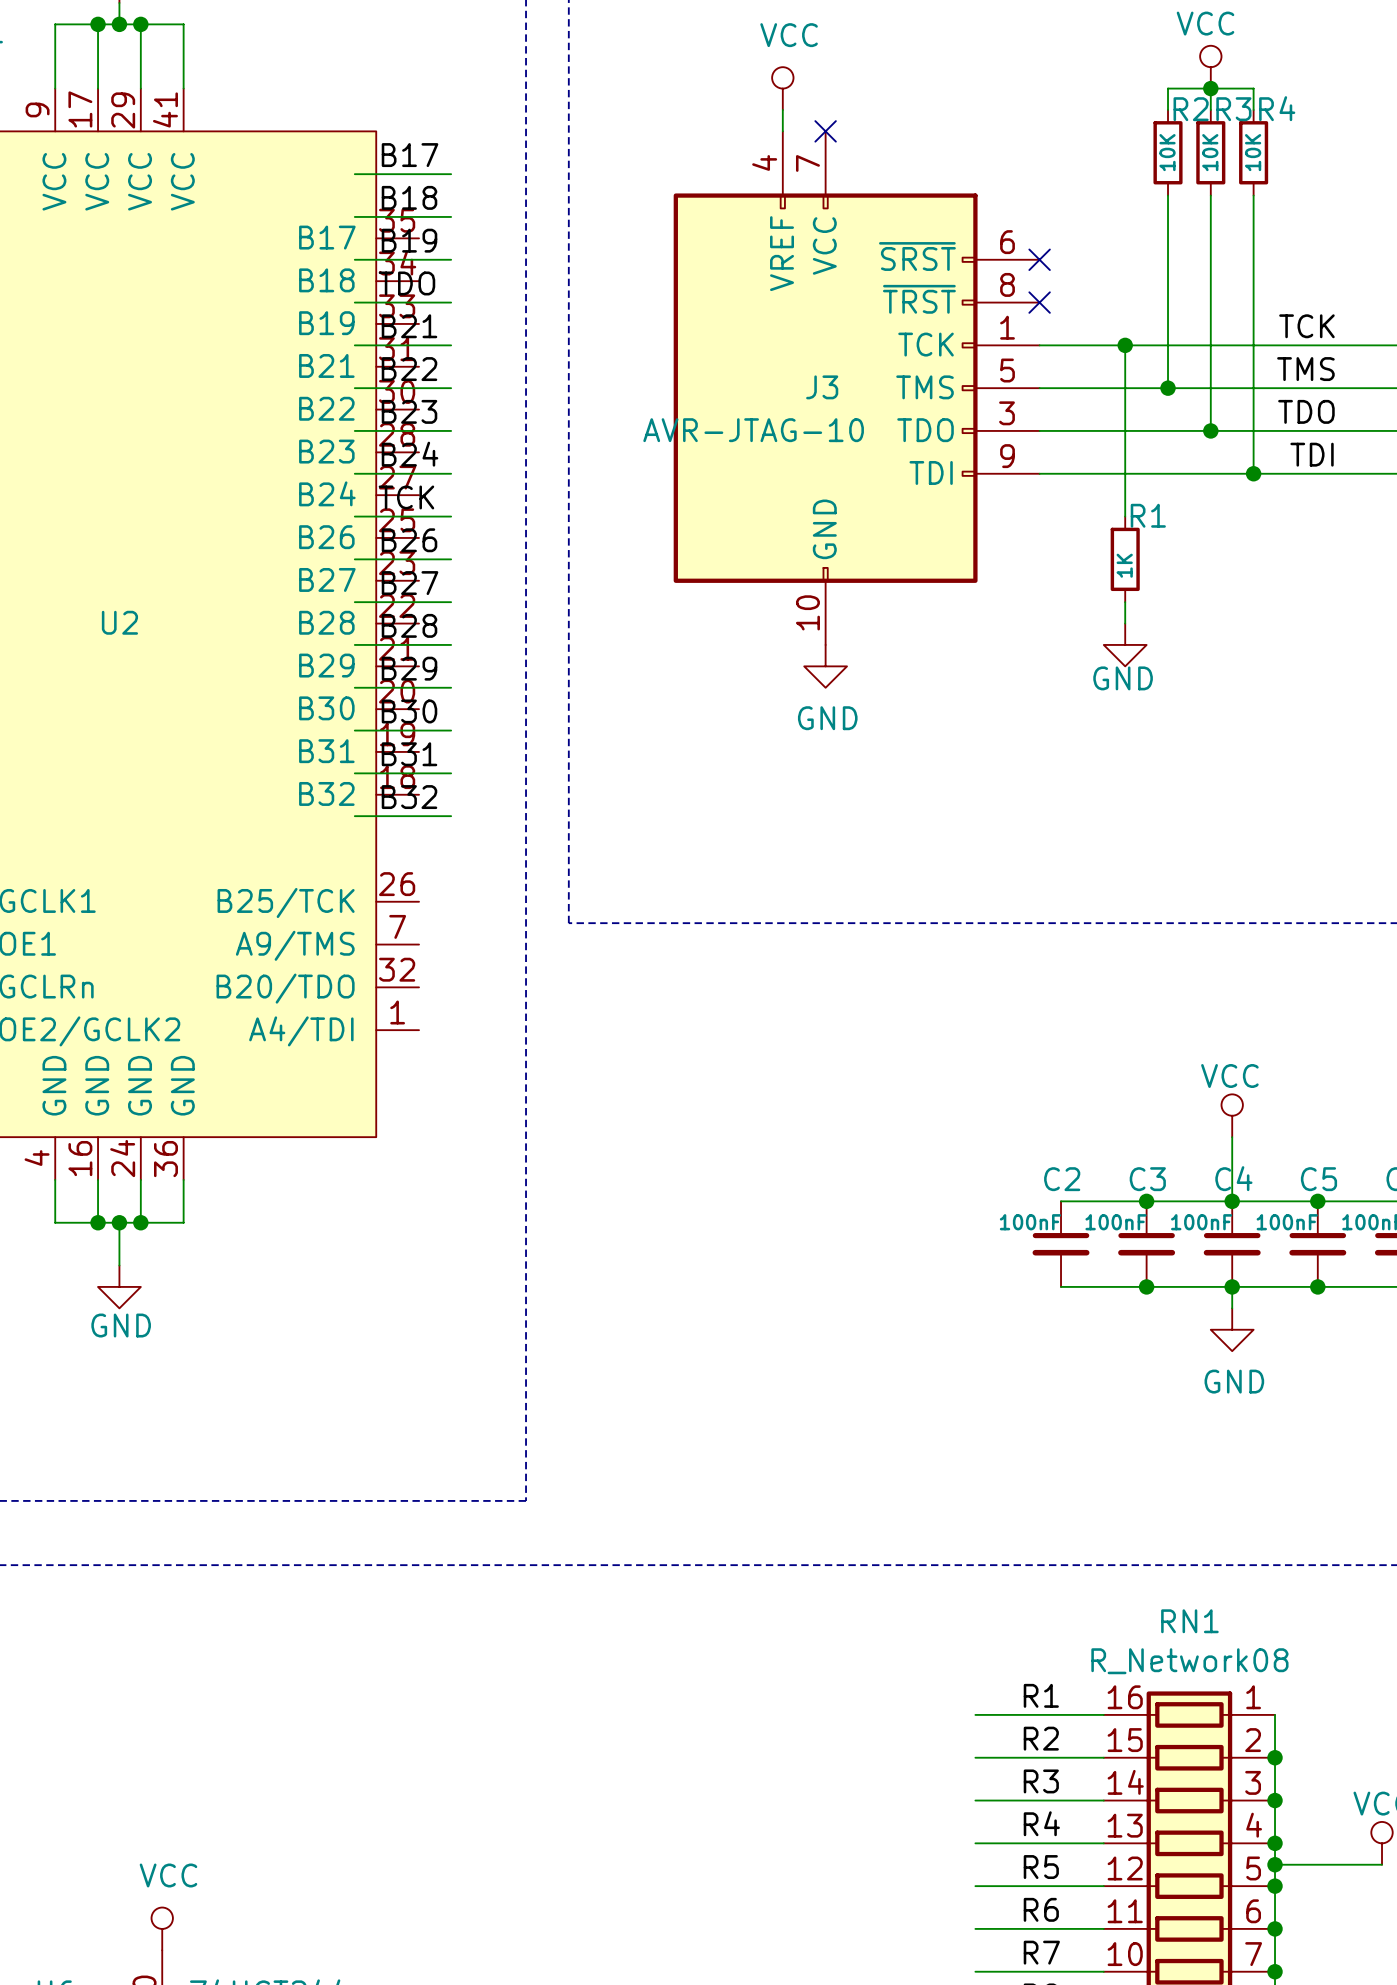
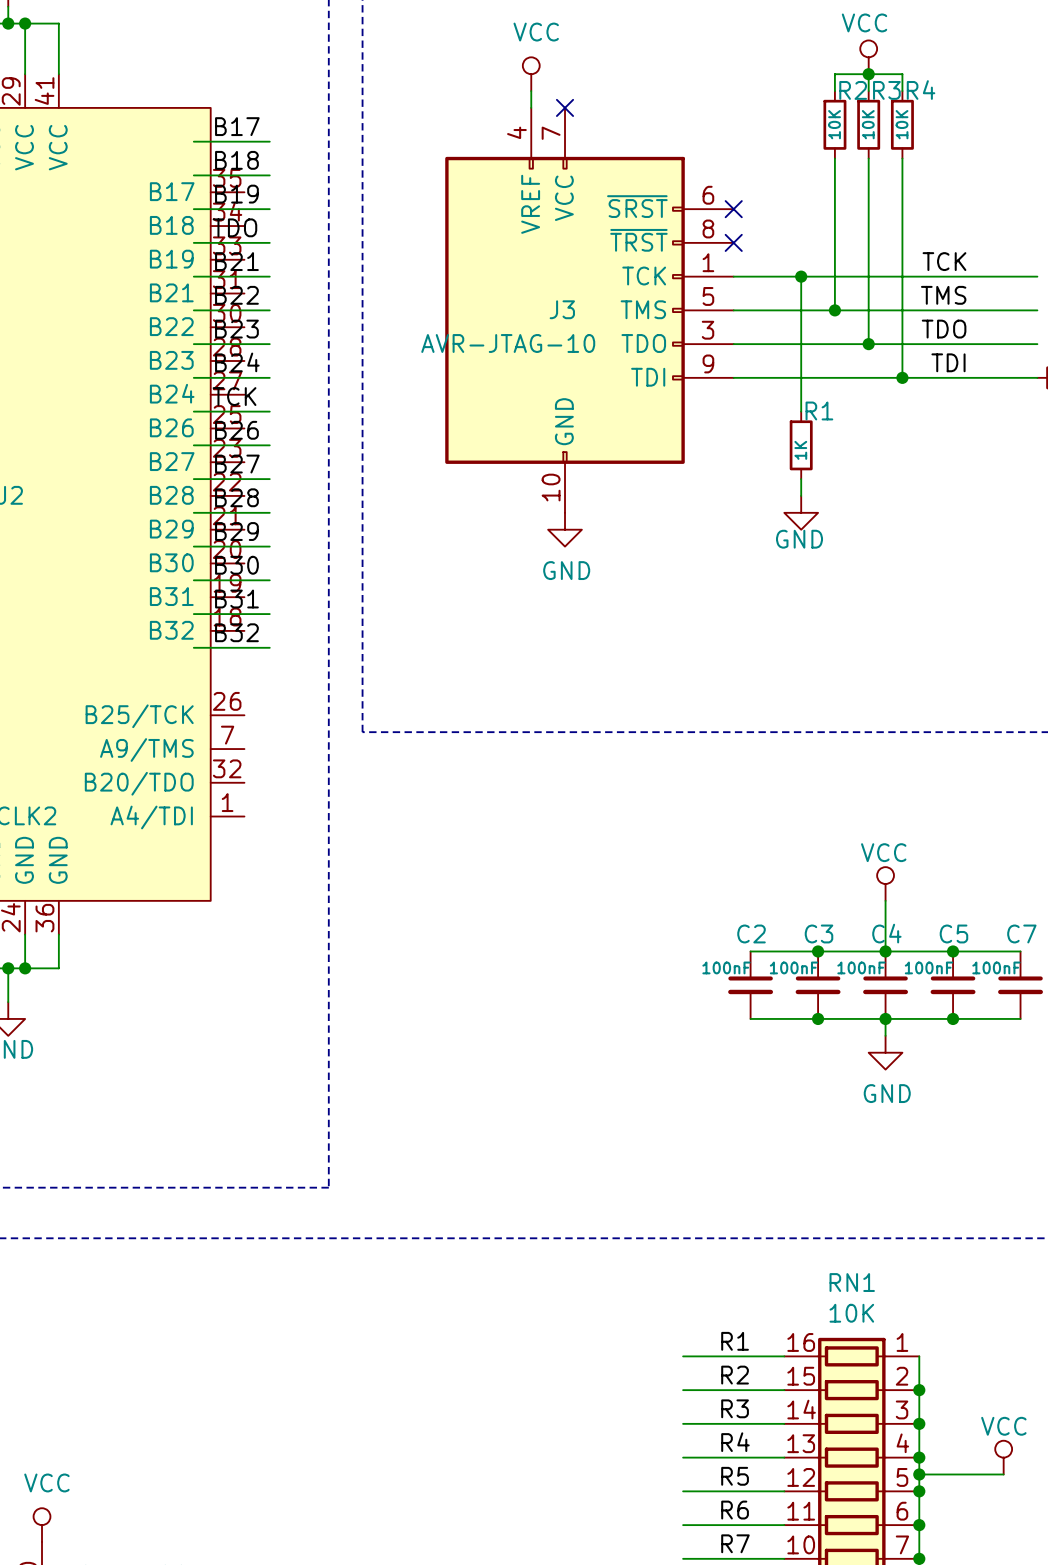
RN1 value: R_Network08 (1189, 1661) -> 10K (851, 1313)

